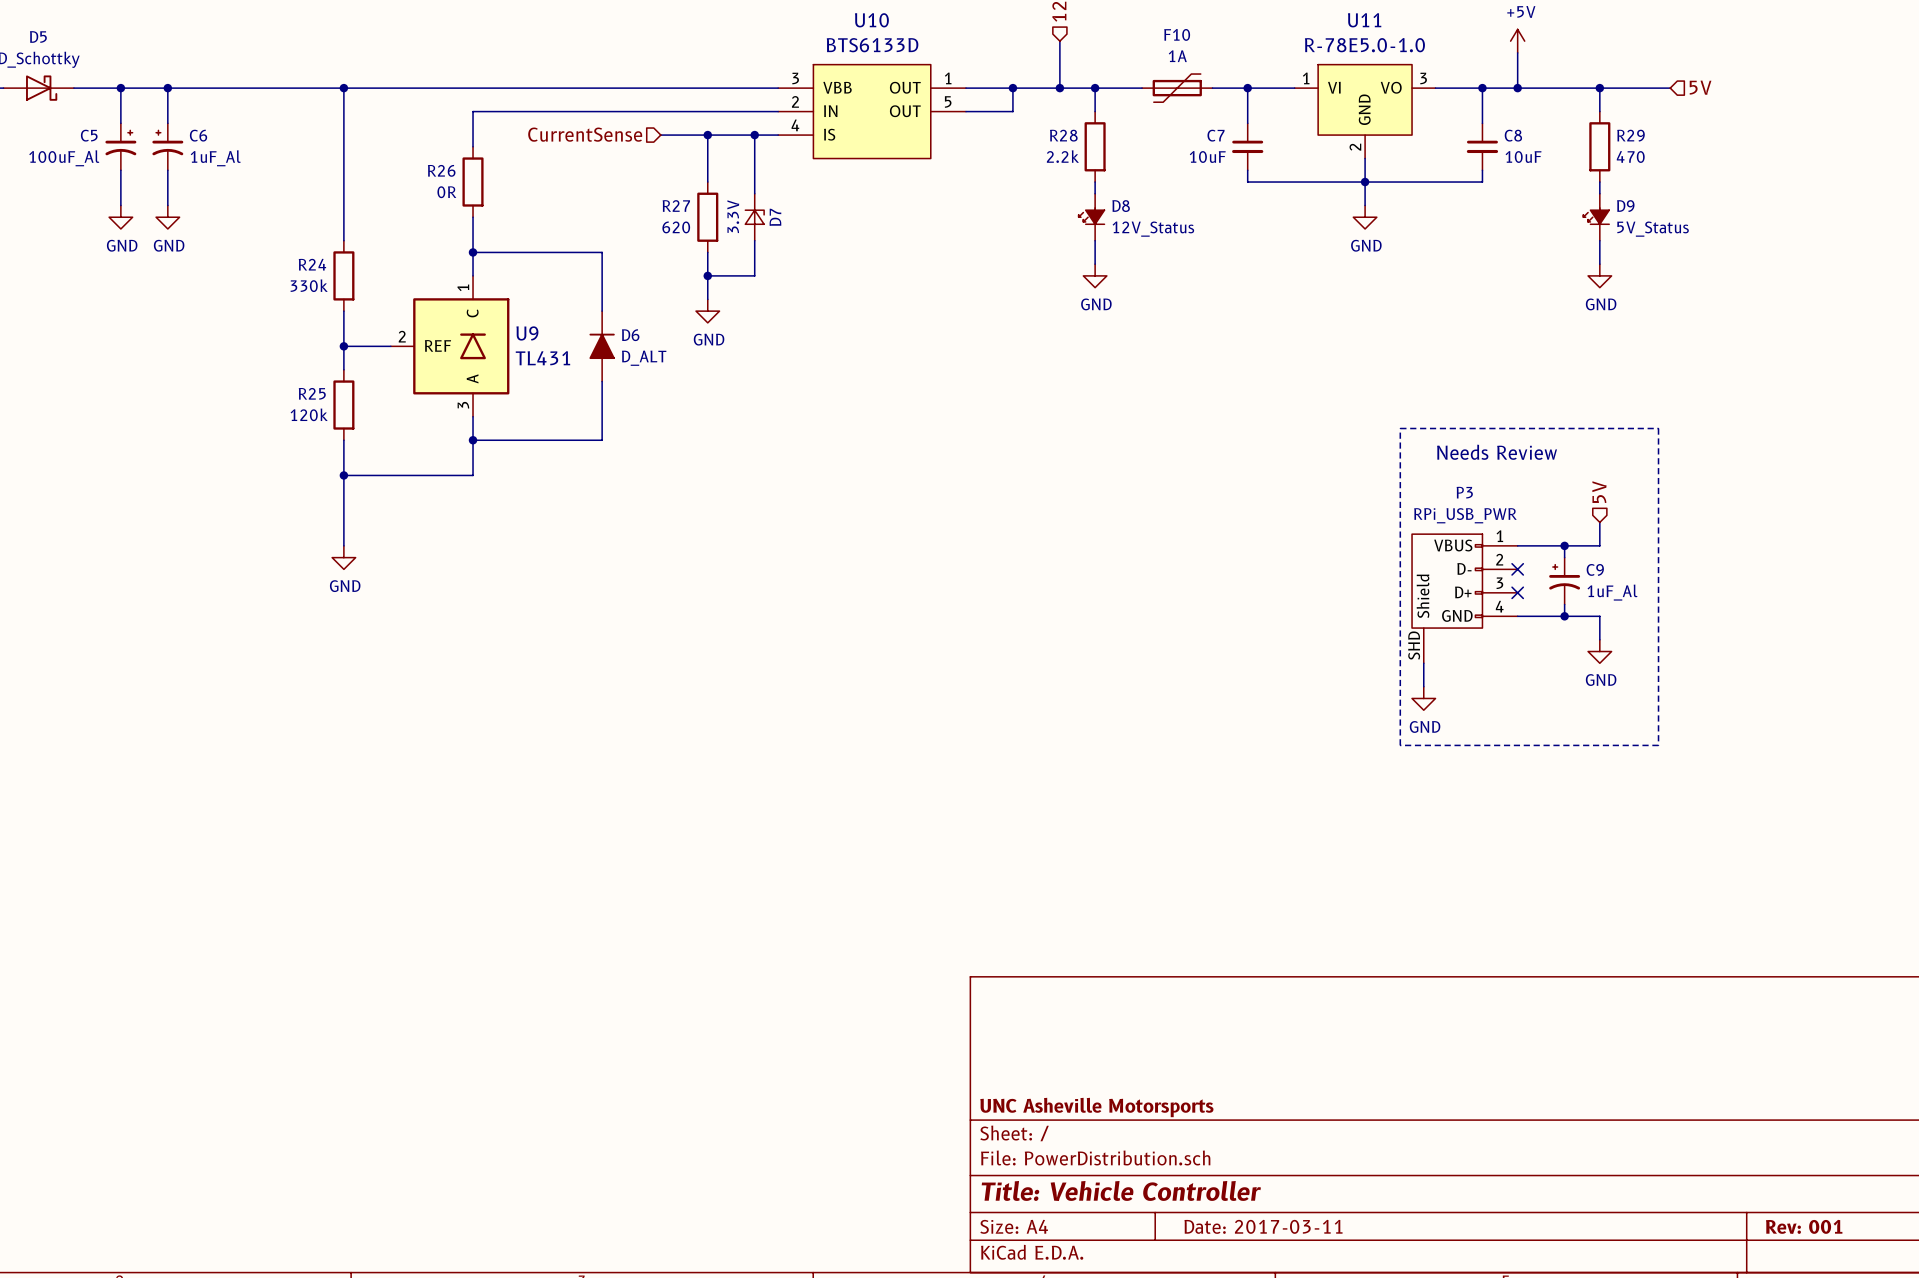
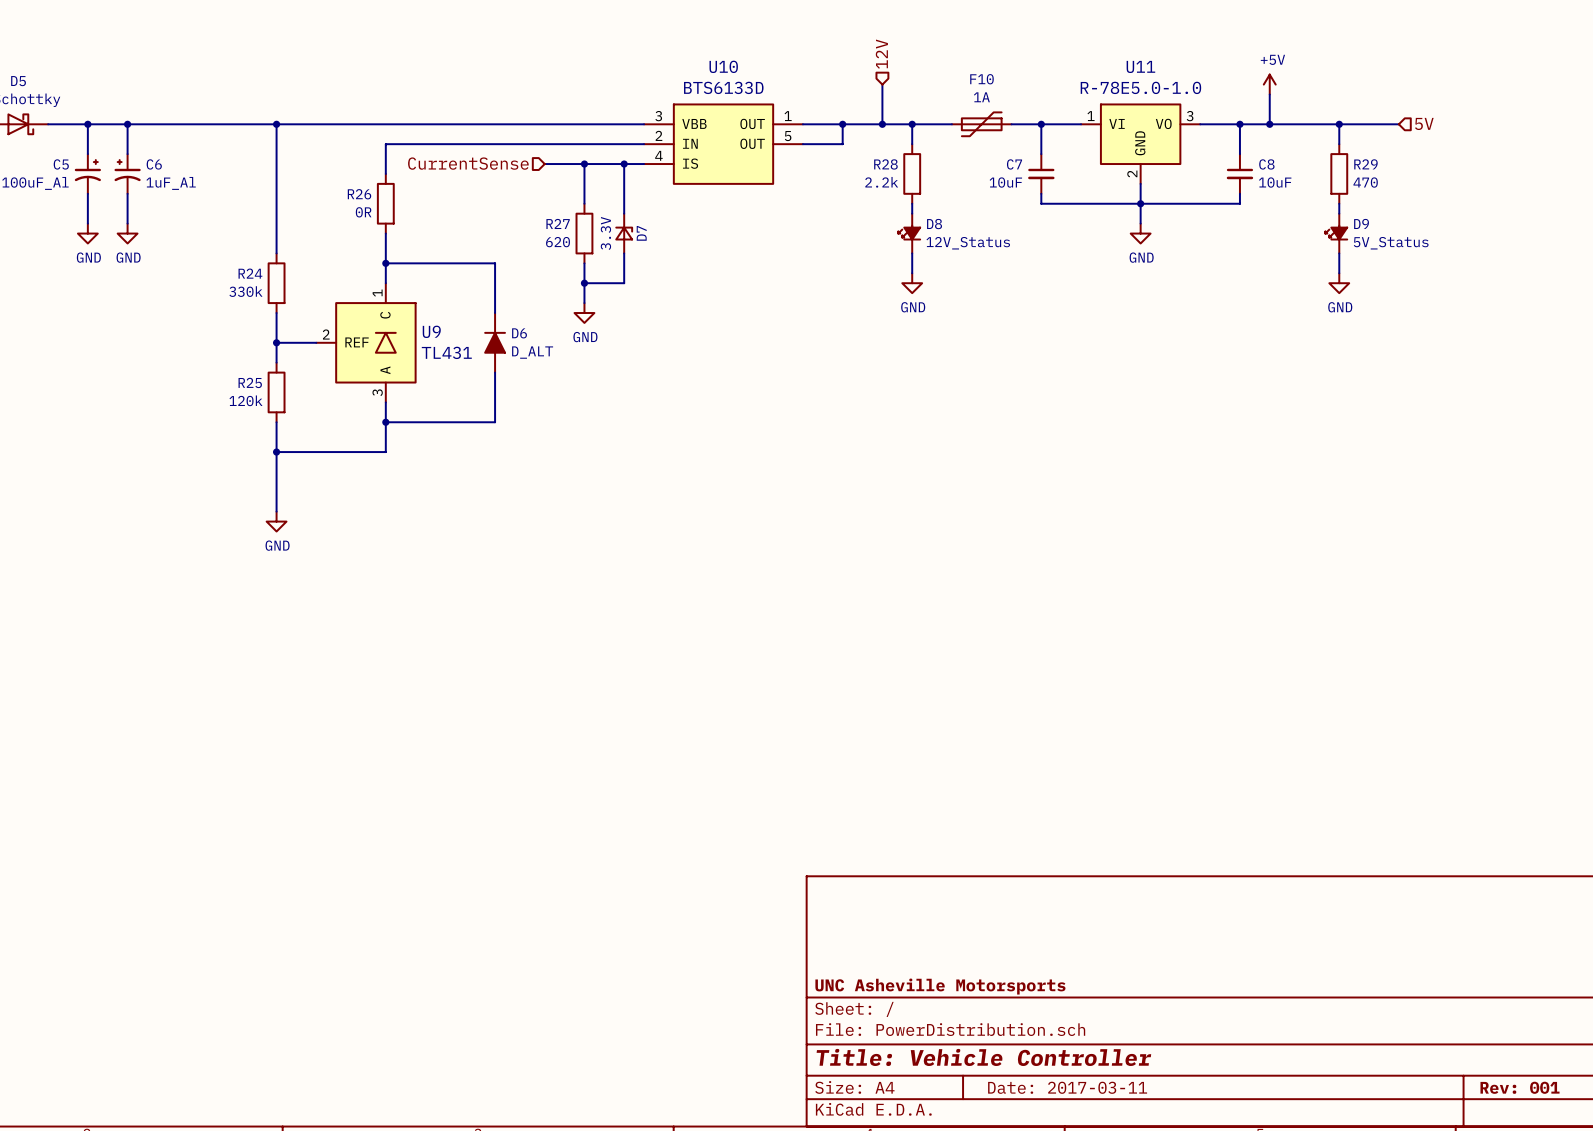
line: (1400, 428) (1658, 428) (1658, 745) (1400, 745) (1400, 428) -> none
text: Needs Review (1497, 452) -> none
hierarchical label: 5V (1599, 492) -> none
wire: (1599, 522) (1599, 545) (1517, 545) -> none
wire: (1564, 545) (1564, 557) -> none
junction: (1564, 545) -> none
no-connect mark: (1517, 569) -> none
C9: 1uF_Al (1564, 581) -> none
no-connect mark: (1517, 592) -> none
P3: RPi_USB_PWR (1464, 598) -> none
wire: (1564, 604) (1564, 616) -> none
wire: (1517, 616) (1599, 616) (1599, 639) -> none
junction: (1564, 616) -> none
power symbol: GND (1599, 651) -> none
wire: (1423, 663) (1423, 686) -> none
power symbol: GND (1423, 698) -> none

